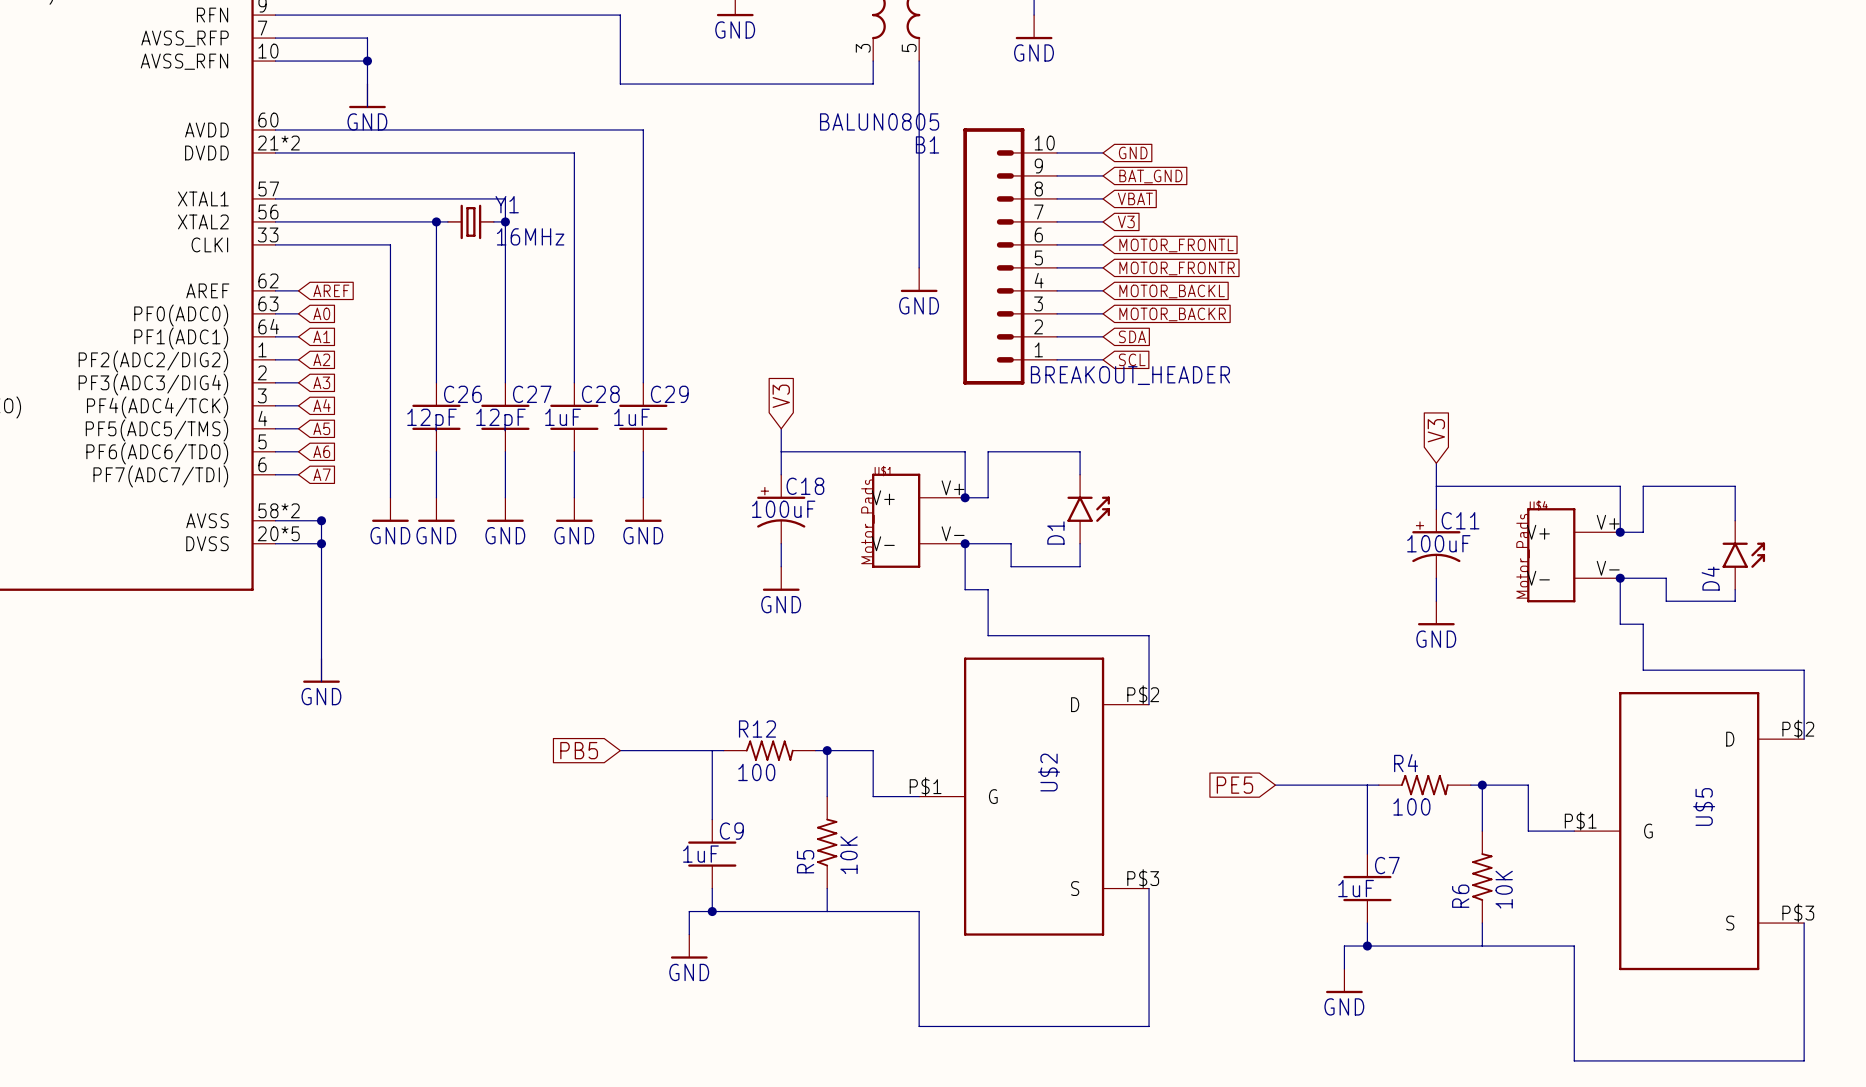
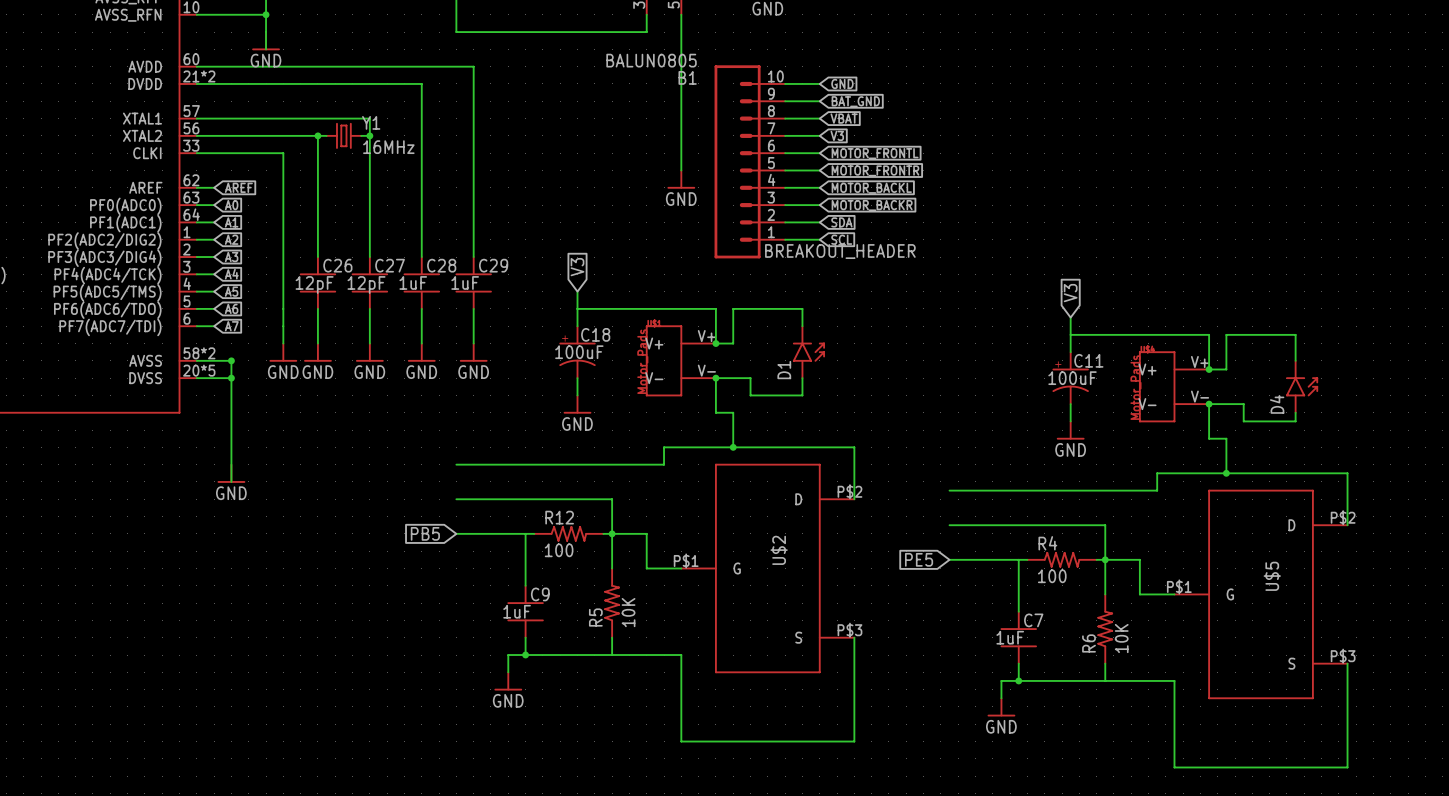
wire: none -> (733, 447) (664, 447) (664, 464) (456, 464)
junction: none -> (733, 447)
wire: none -> (1226, 473) (1157, 473) (1157, 490) (949, 490)
junction: none -> (1226, 473)
wire: none -> (456, 499) (612, 499) (612, 533)
wire: none -> (949, 525) (1105, 525) (1105, 559)

